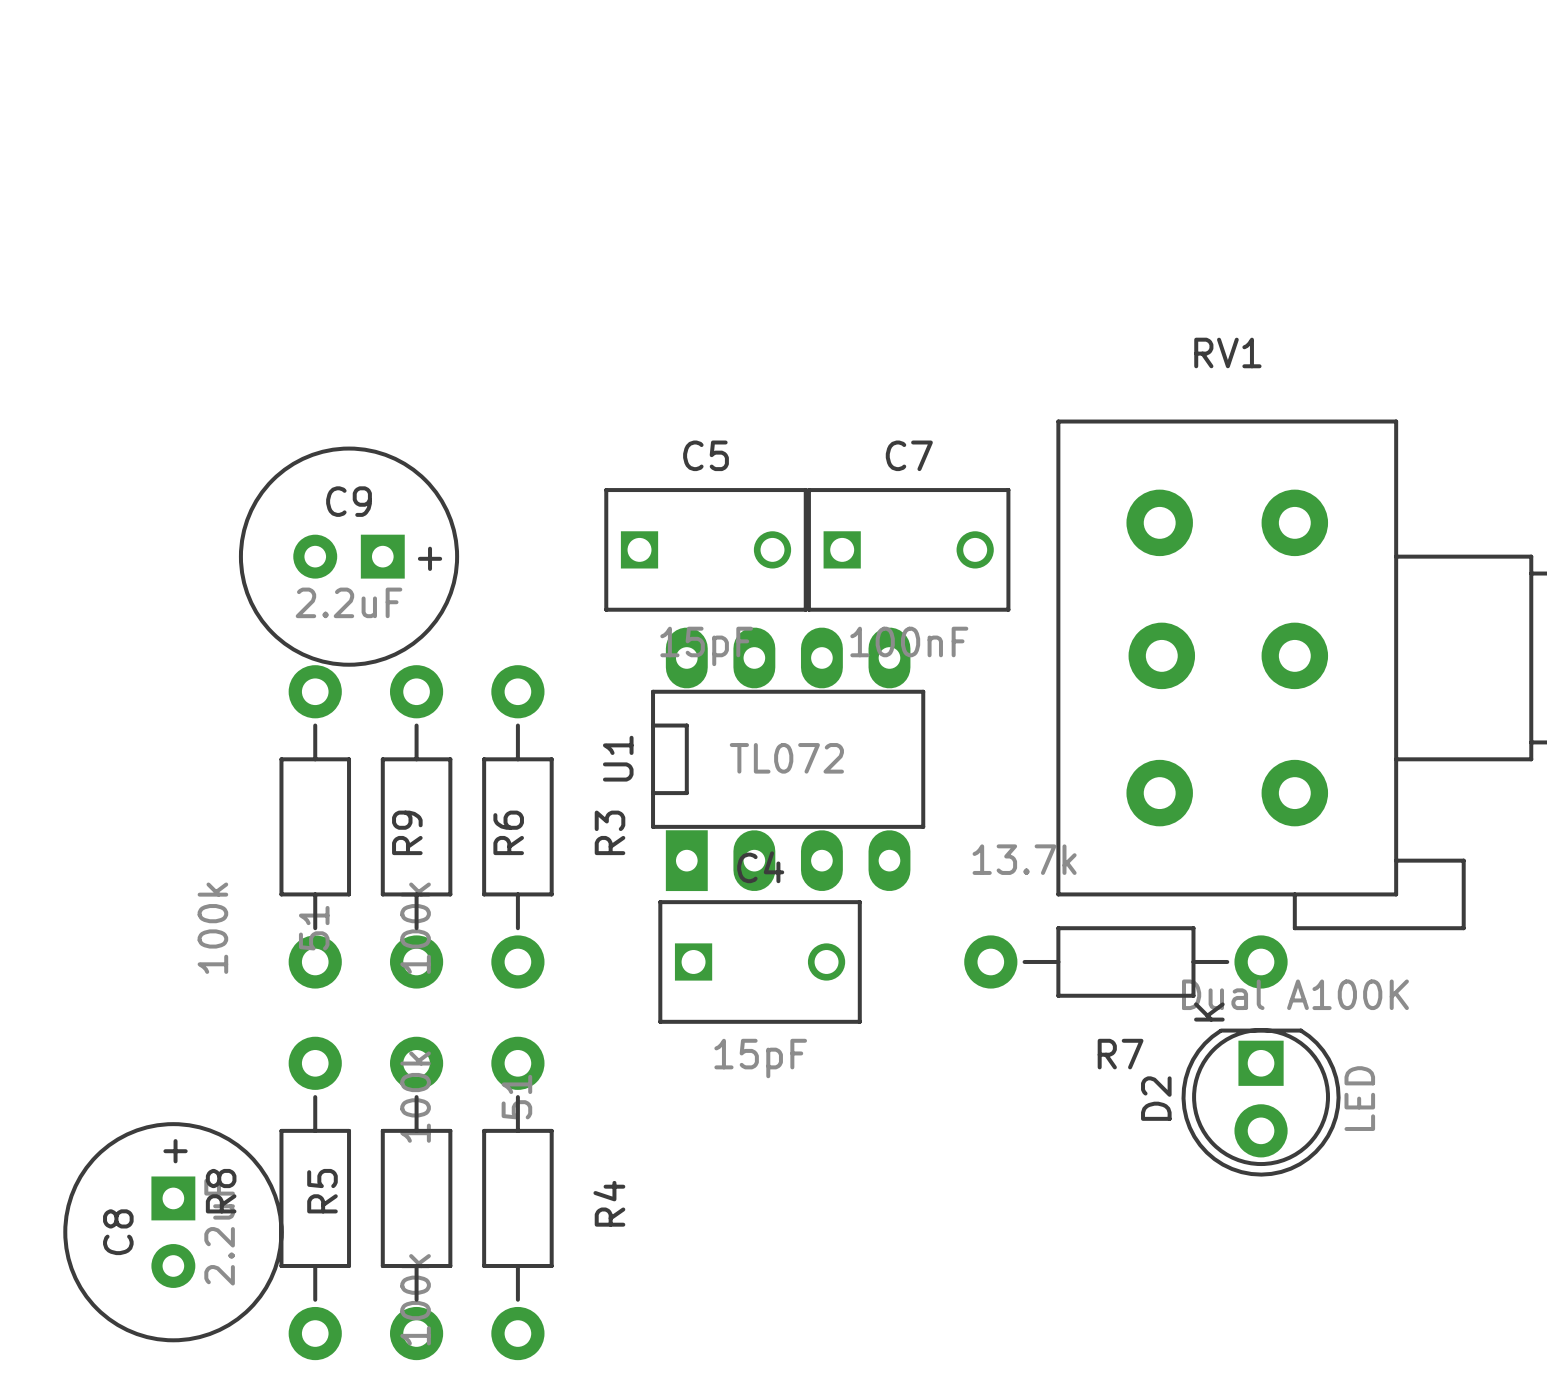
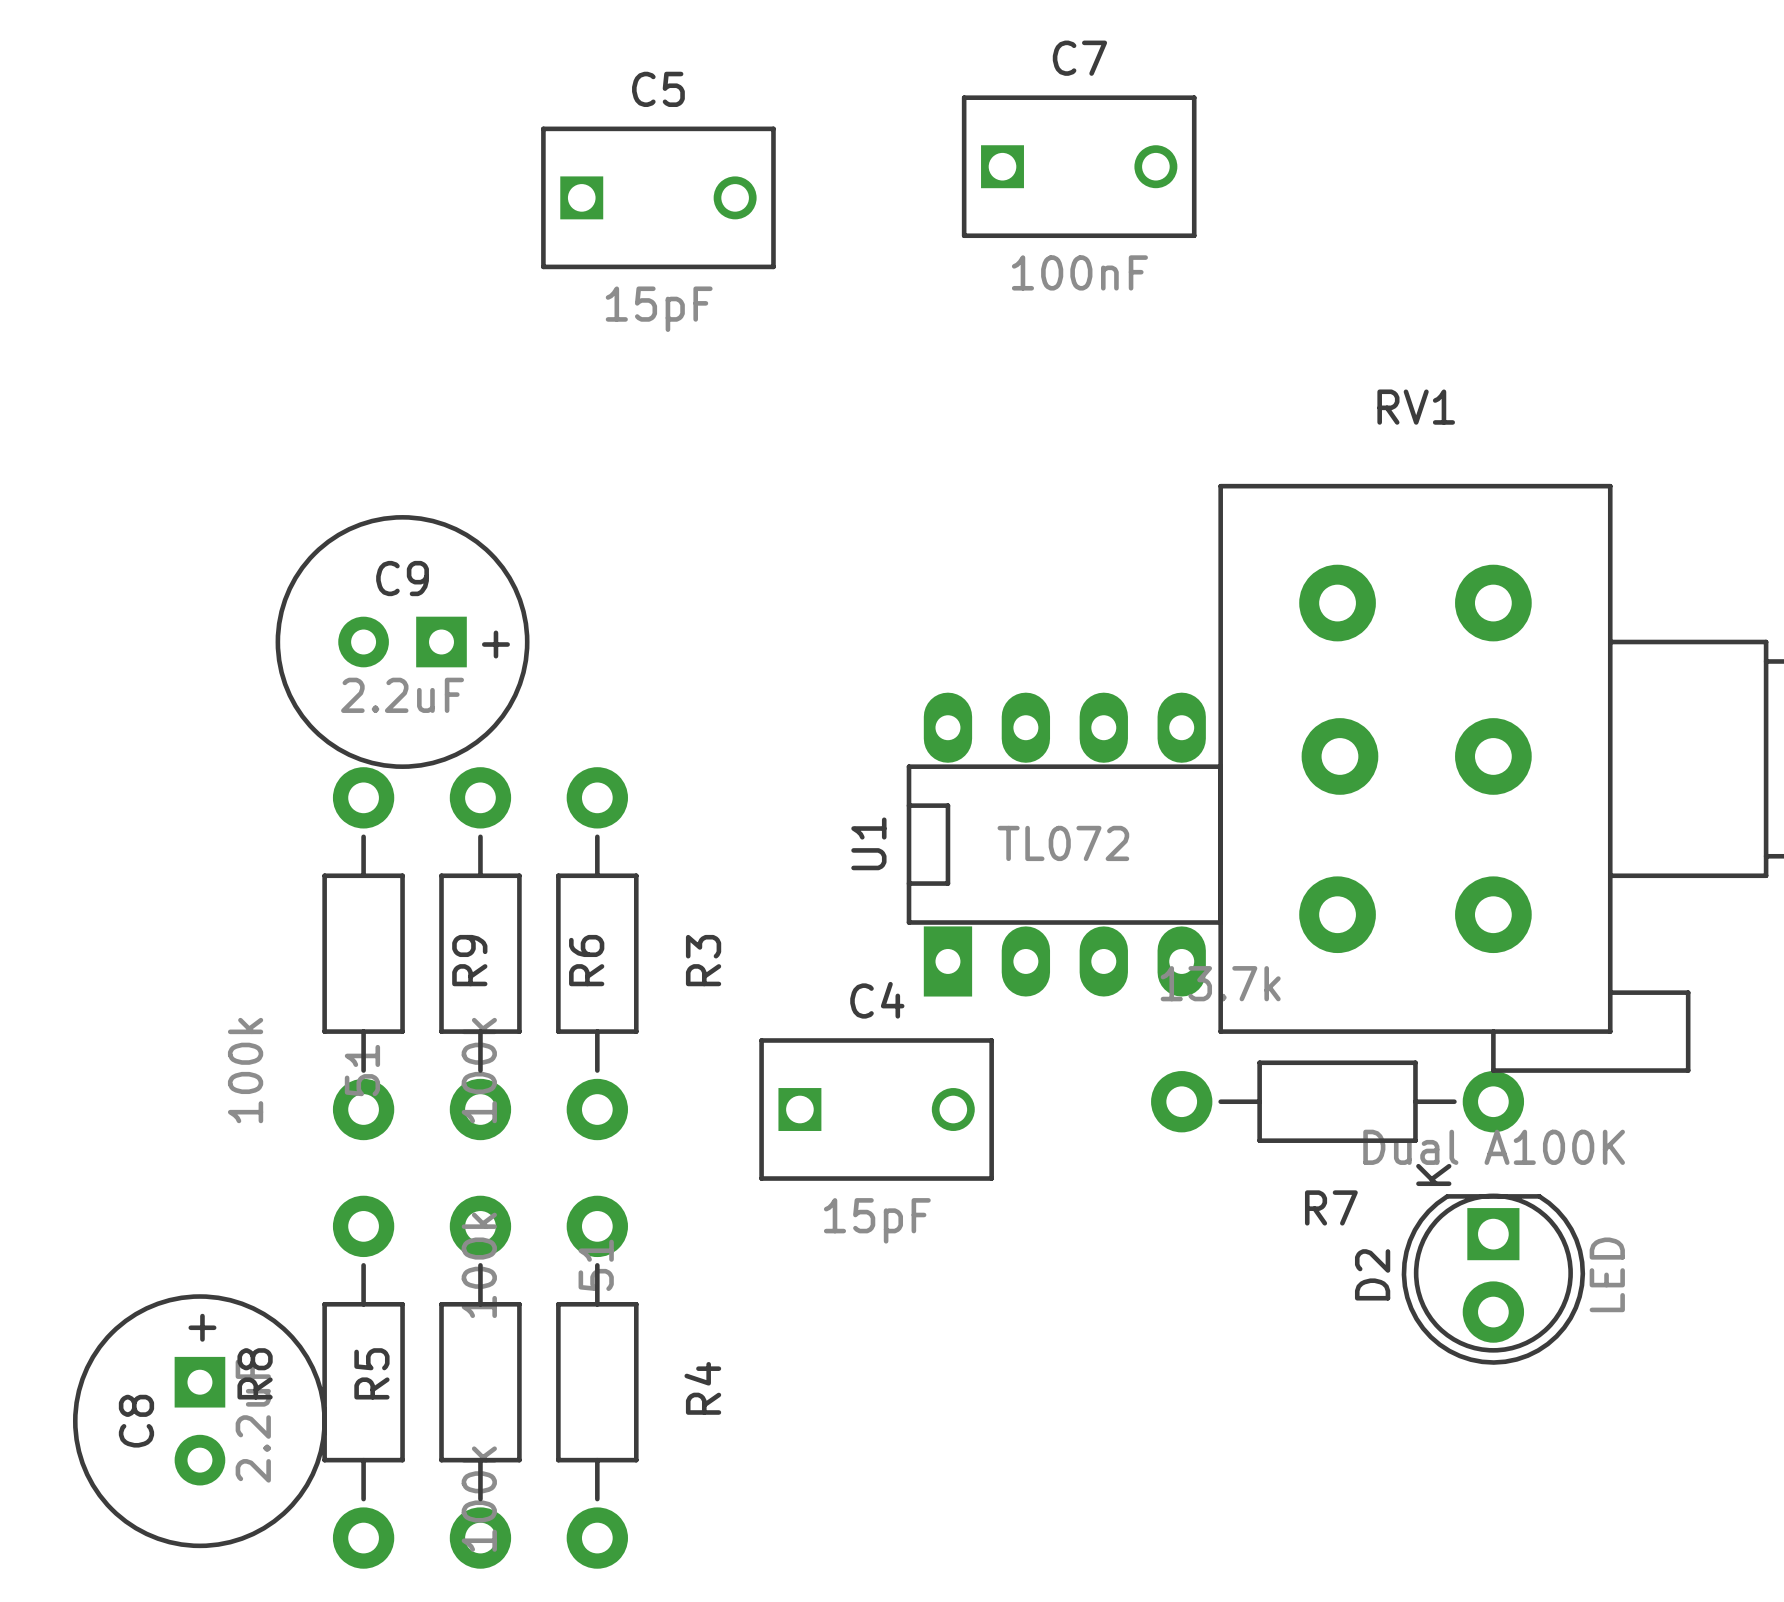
C5 position: (706, 549) -> (658, 197)
C7 position: (908, 549) -> (1079, 166)
U1 position: (788, 759) -> (1064, 844)
R7 position: (1125, 961) -> (1337, 1101)
D2 position: (1261, 1102) -> (1493, 1279)

